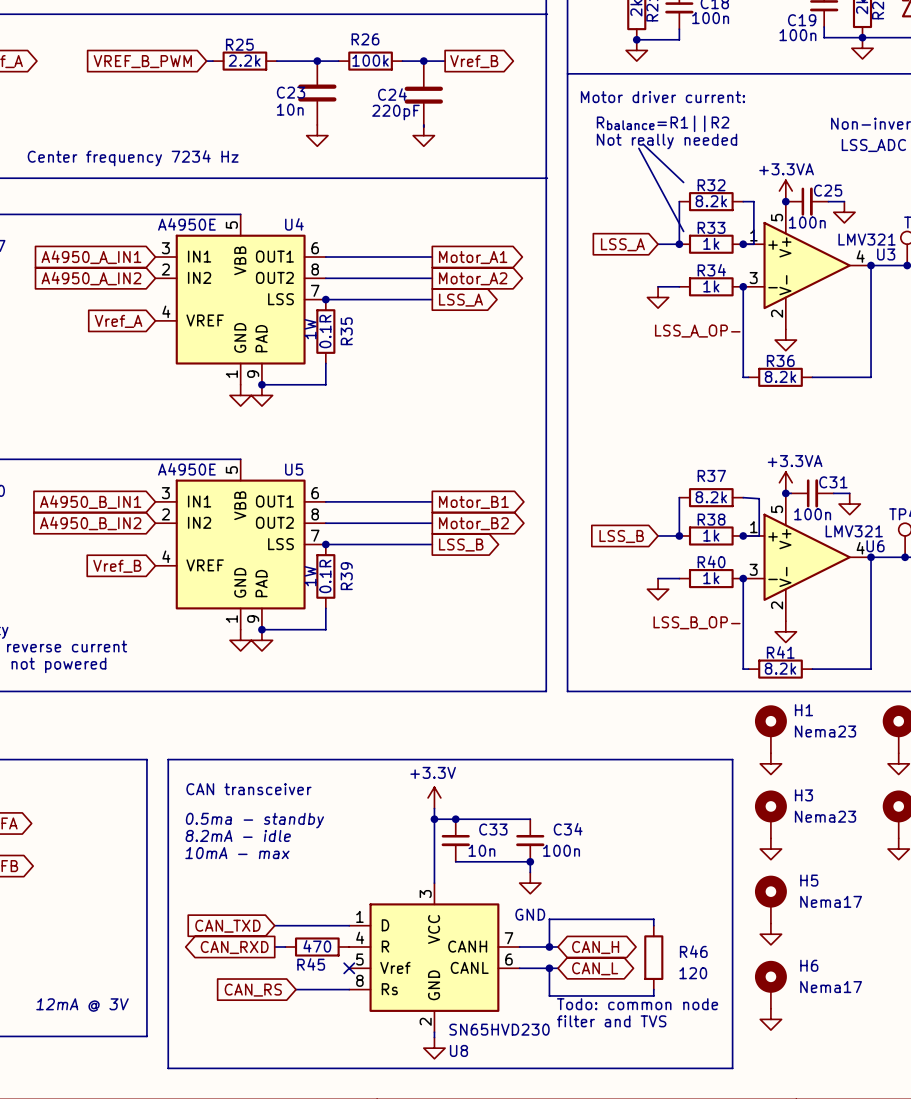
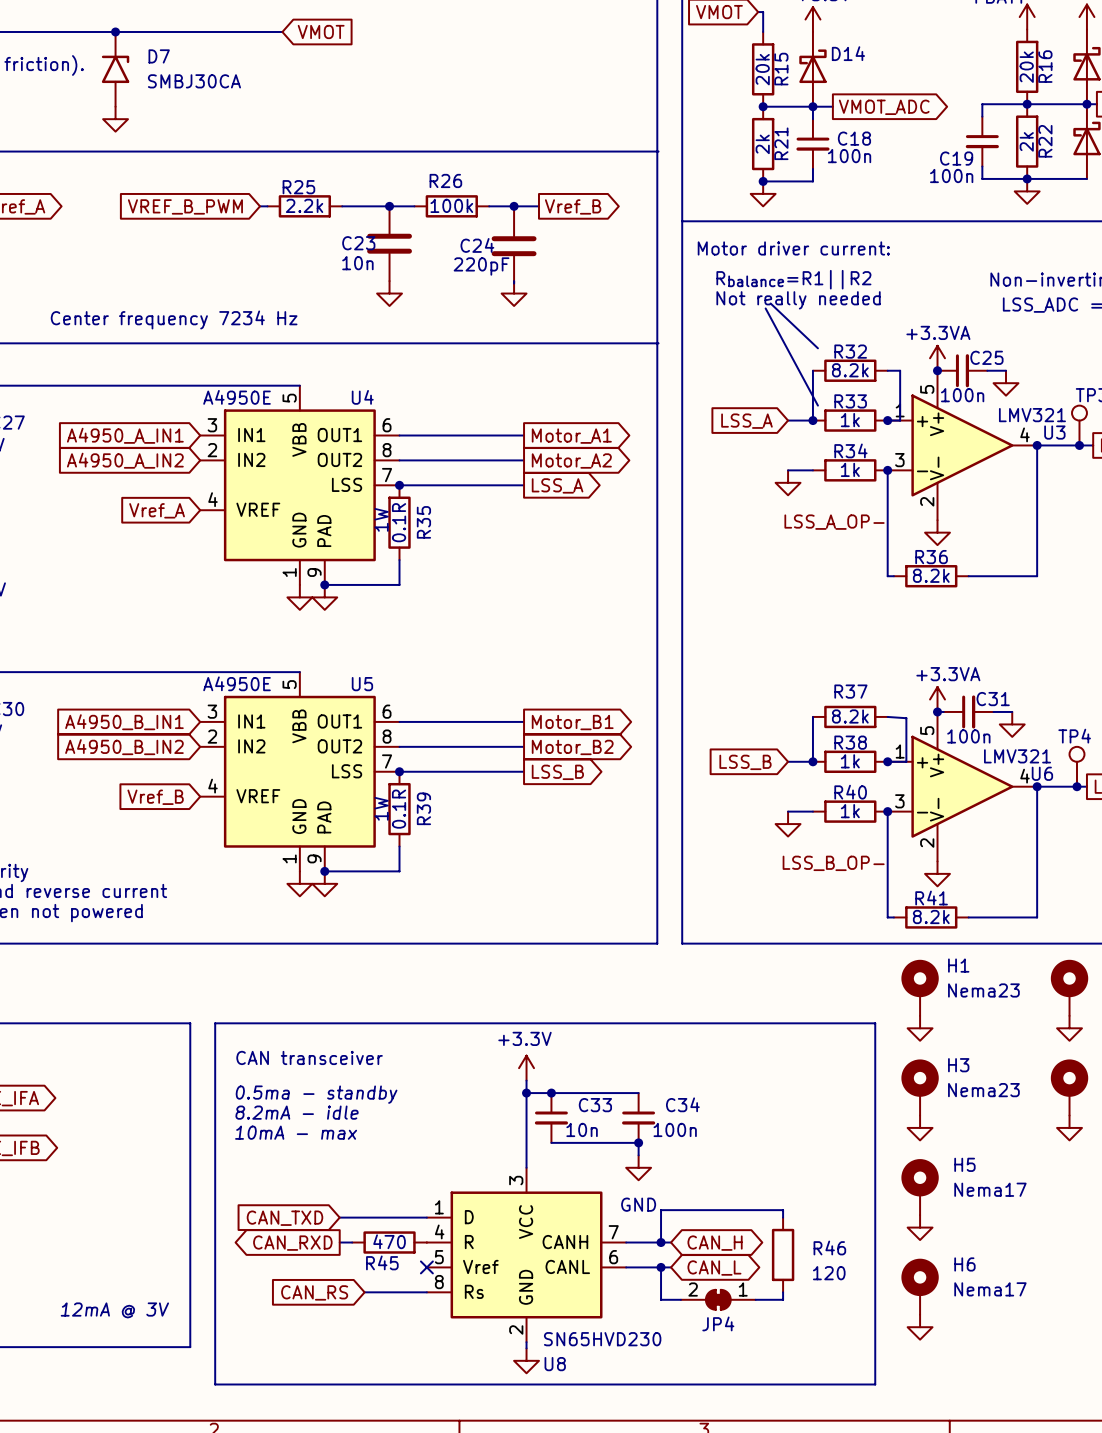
JP4: none -> (718, 1299)
text: Todo: common node (637, 1004) -> none
text: filter and TVS (611, 1021) -> none

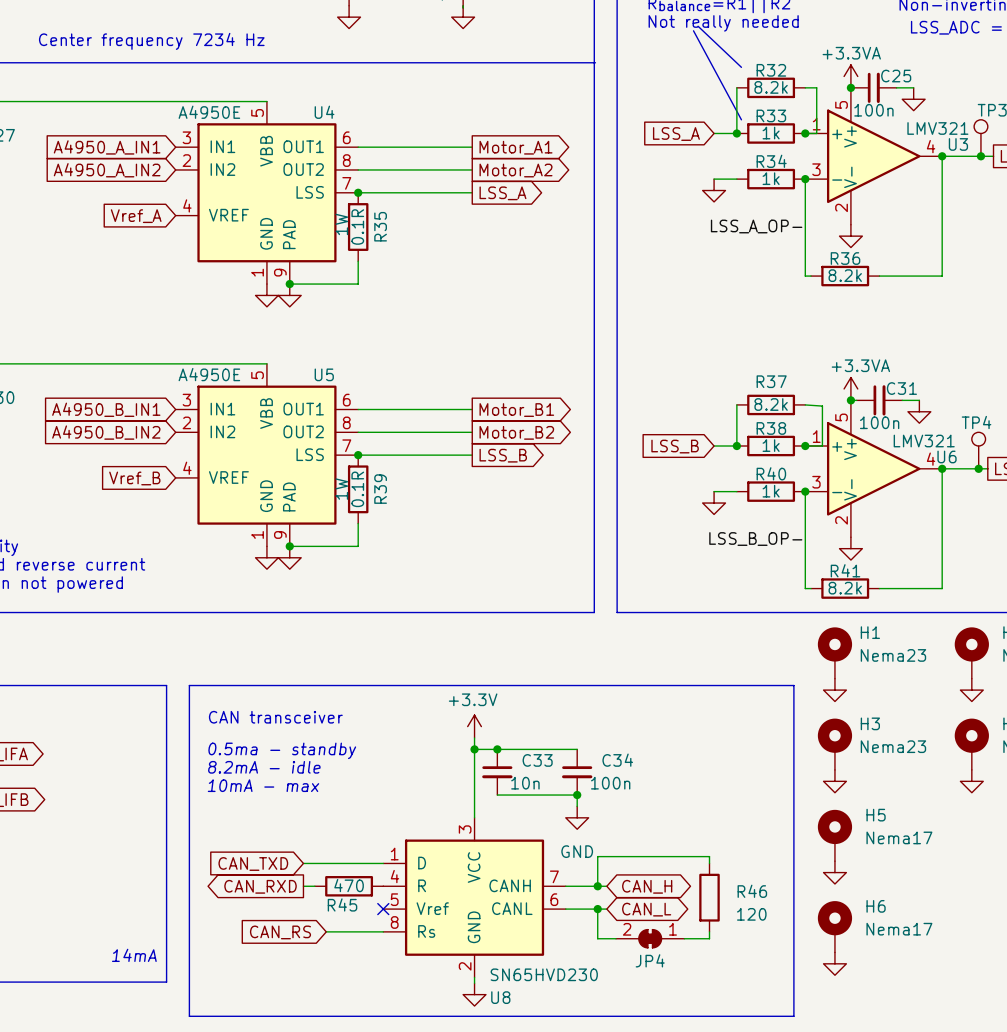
text: 12mA @ 3V (114, 1310) -> none
text: none -> 14mA (134, 955)

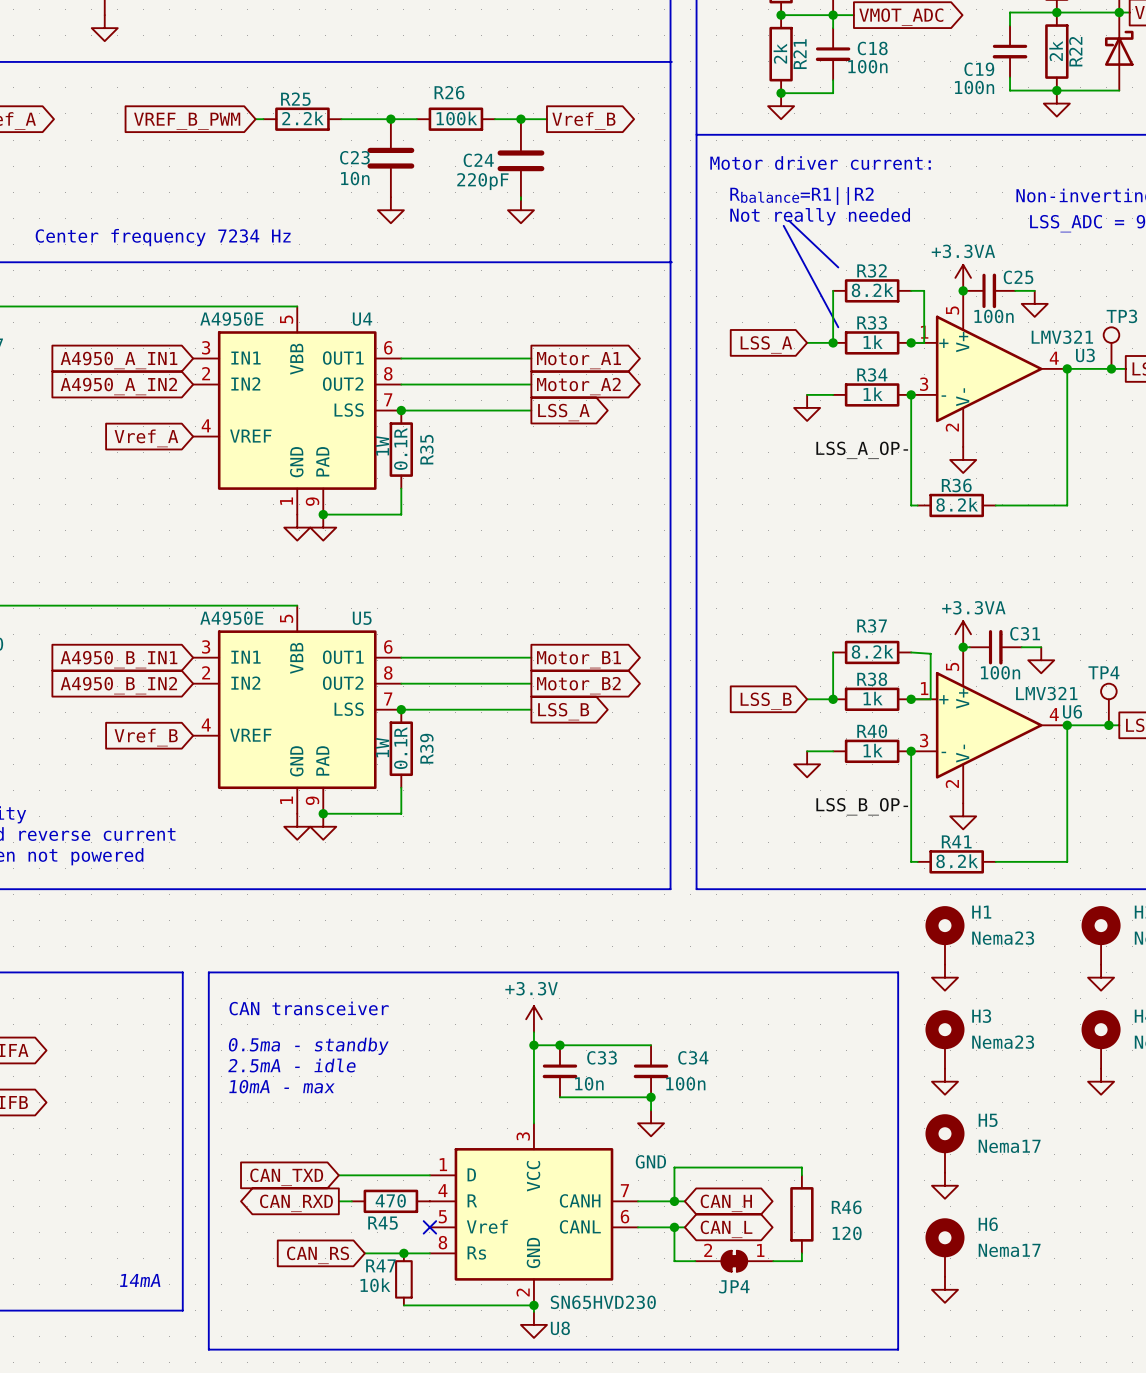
text: 8.2mA - idle (264, 767) -> 2.5mA - idle (292, 1065)
junction: none -> (403, 1253)
R47: none -> 10k (403, 1279)
wire: none -> (403, 1305) (533, 1305)
junction: none -> (533, 1305)

